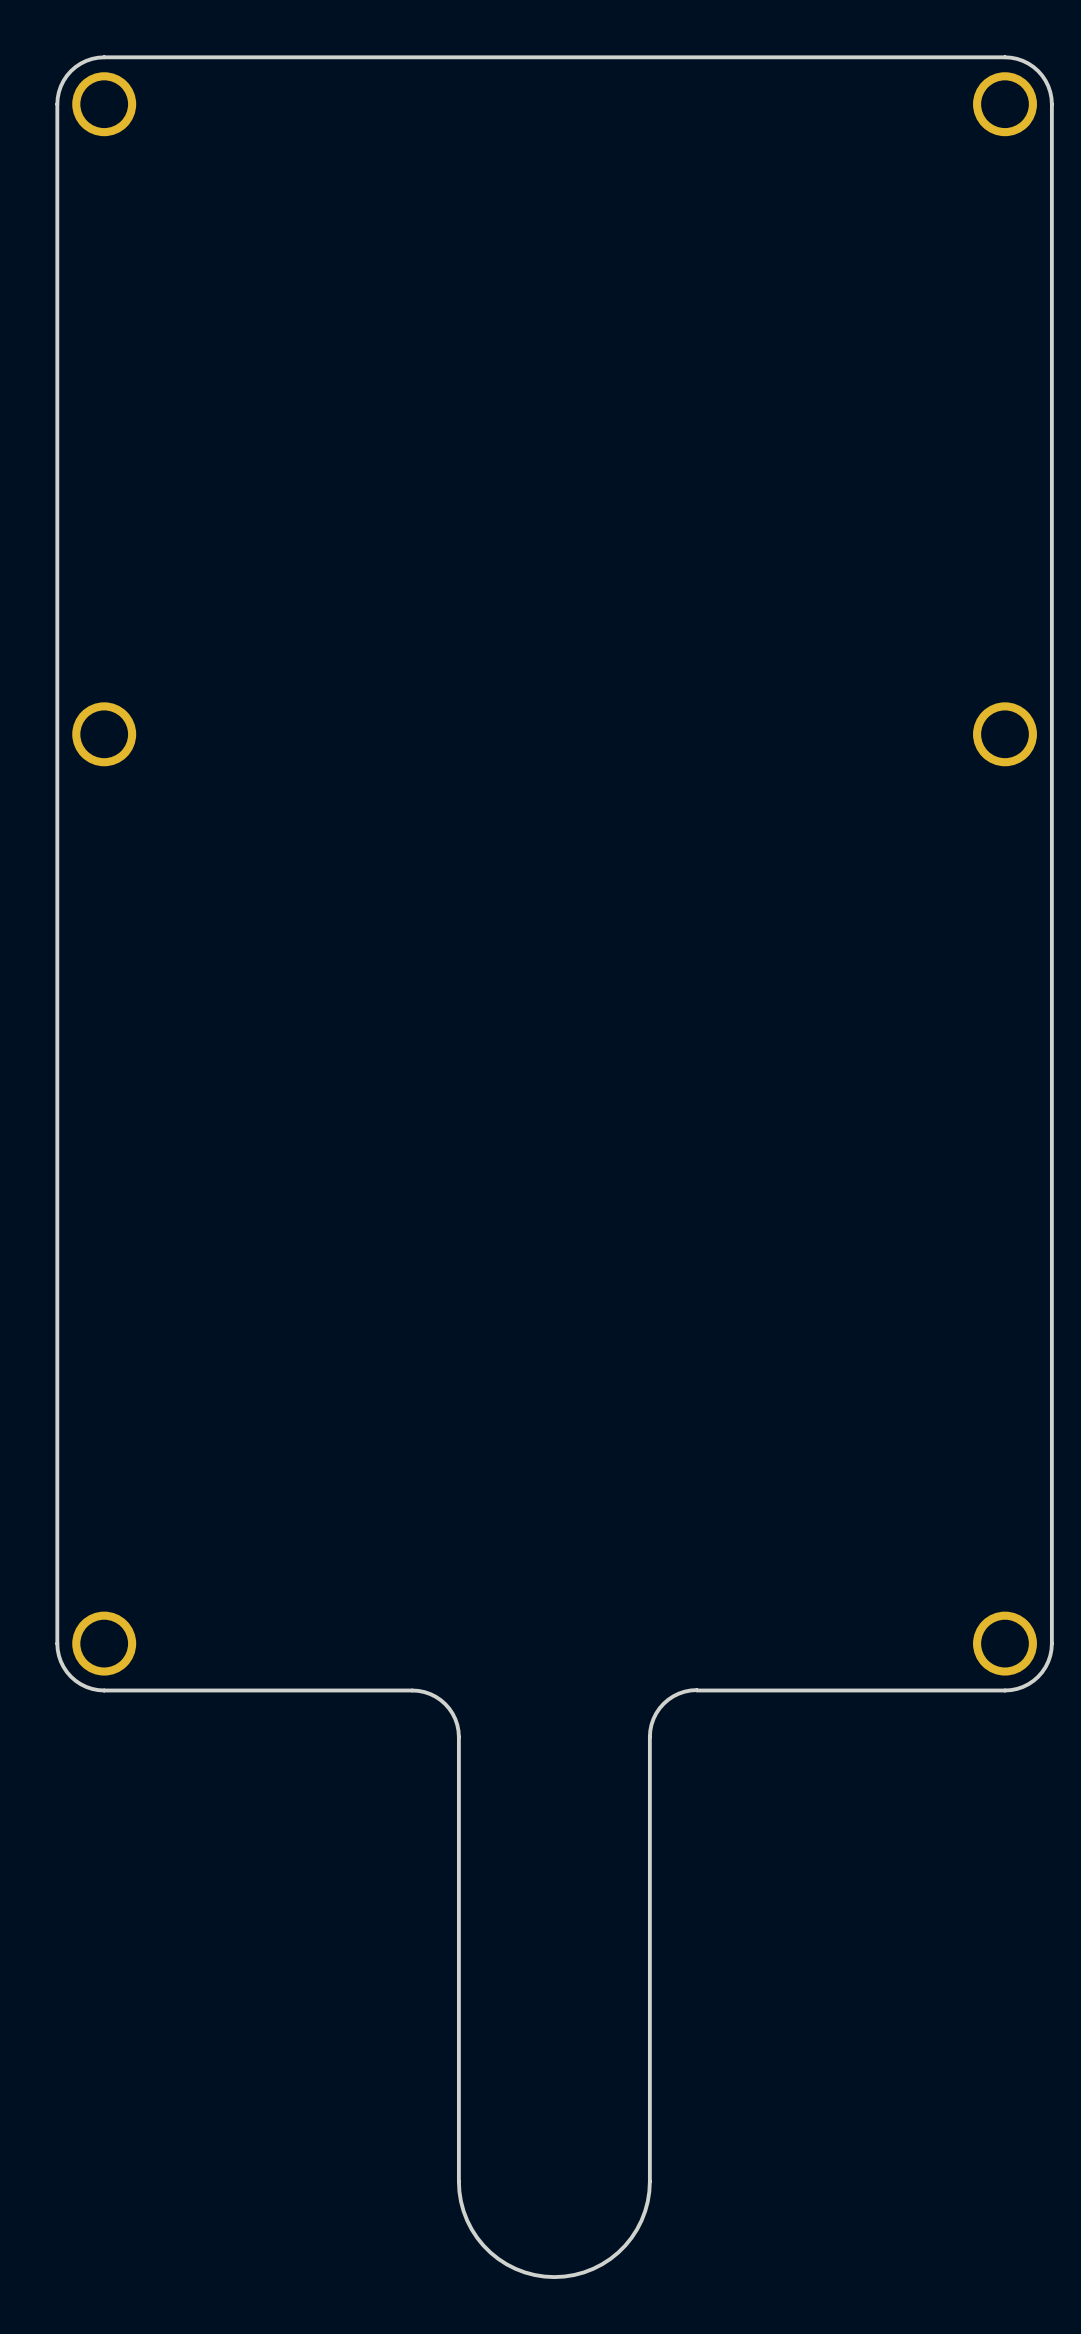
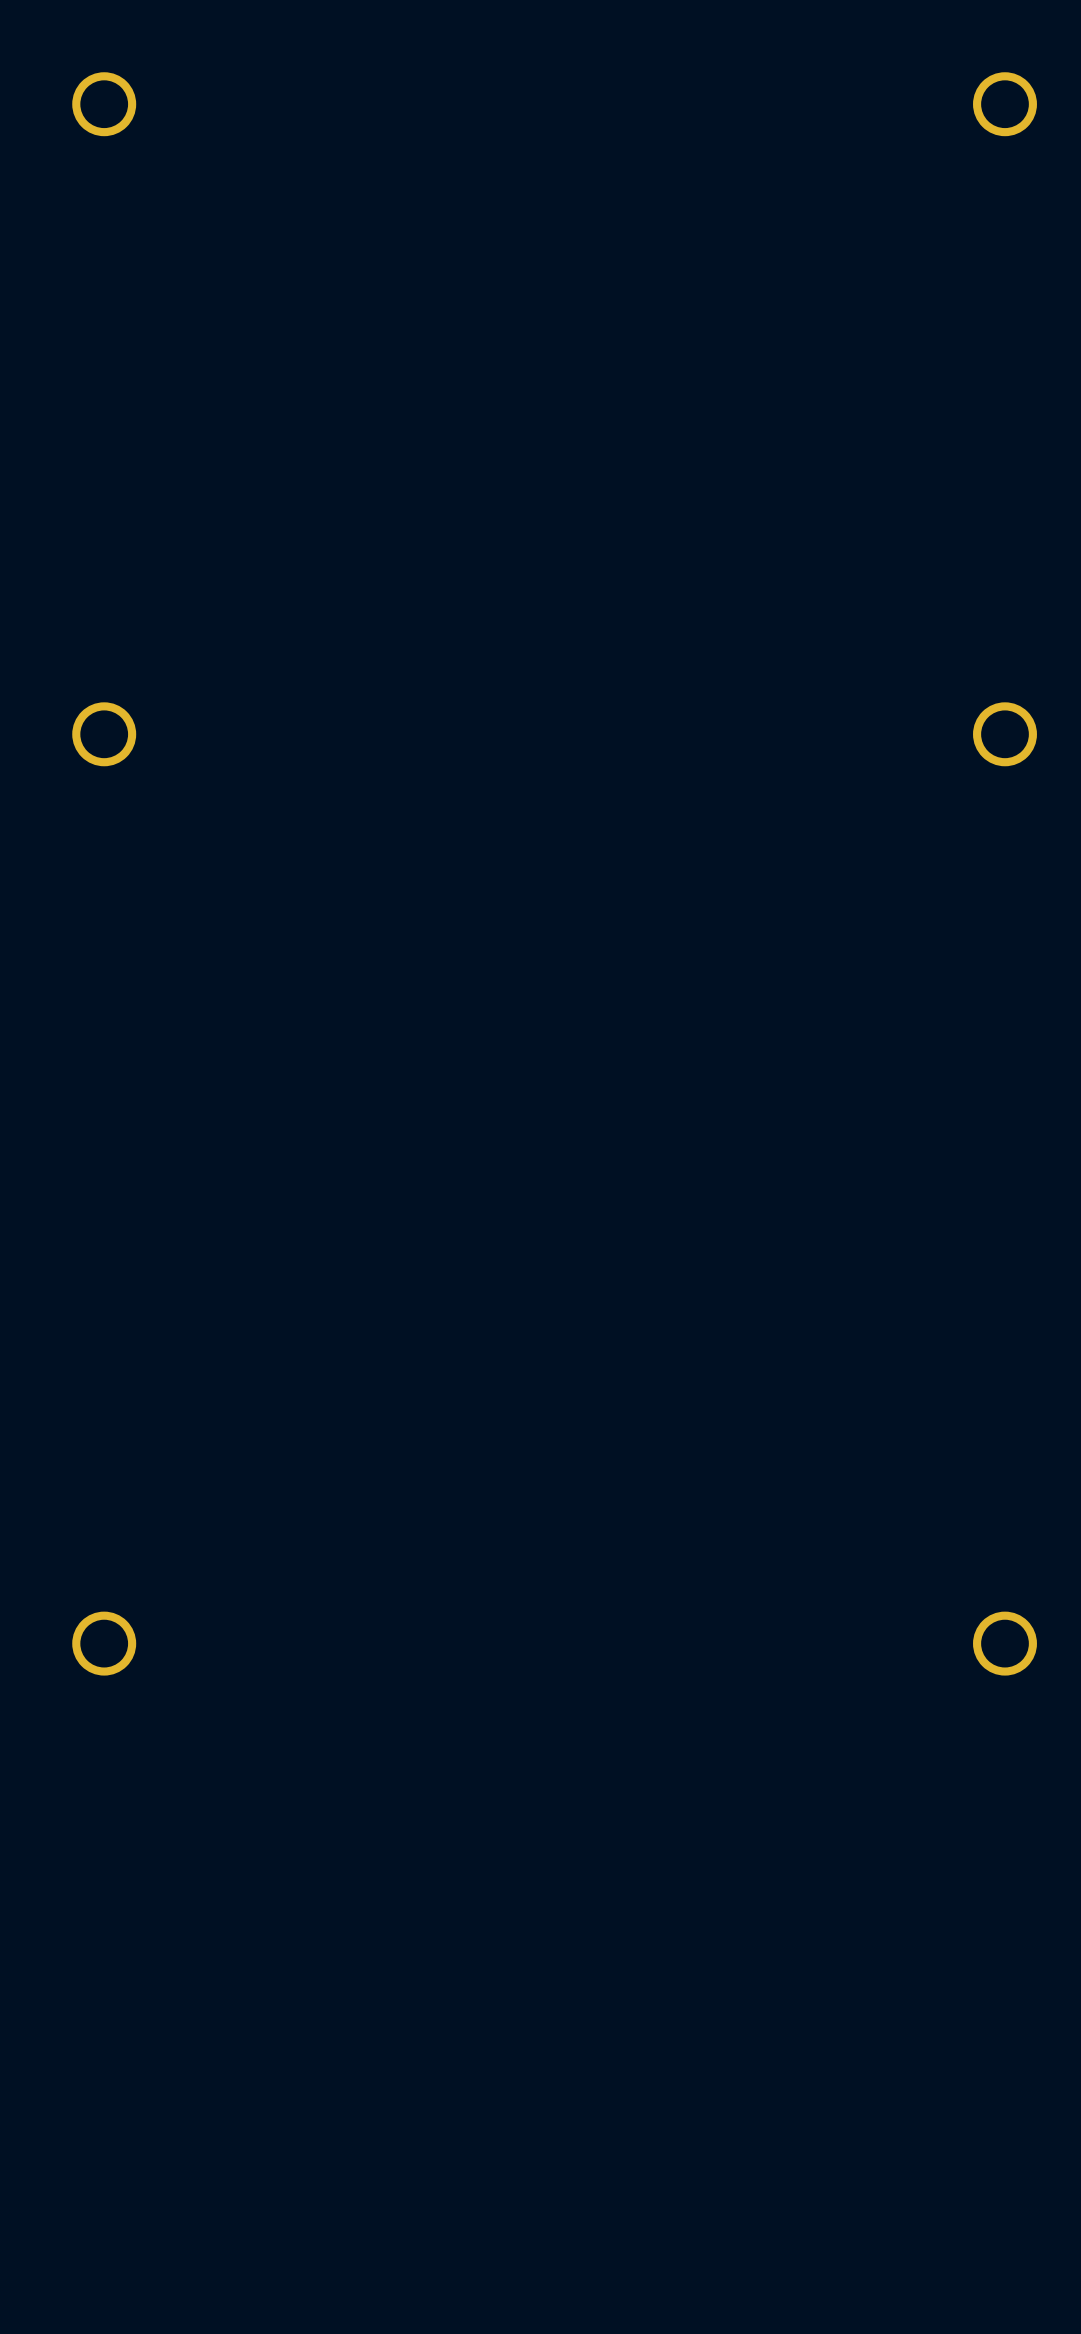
board edge: (412, 1690) (98, 1690) (86, 1686) (75, 1680) (63, 1667) (58, 1655) (57, 1643) (57, 104) (60, 86) (67, 75) (75, 67) (92, 58) (104, 57) (1011, 57) (1022, 60) (1038, 71) (1048, 86) (1051, 104) (1051, 1649) (1048, 1661) (1038, 1676) (1022, 1686) (1011, 1690) (696, 1690) -> none
board edge: (696, 1690) (678, 1693) (668, 1699) (656, 1713) (650, 1730) (649, 2181) (647, 2201) (637, 2229) (618, 2252) (602, 2264) (583, 2272) (554, 2277) (524, 2272) (506, 2264) (490, 2252) (471, 2229) (460, 2201) (458, 2181) (458, 1730) (452, 1713) (440, 1700) (430, 1694) (412, 1690) -> none

